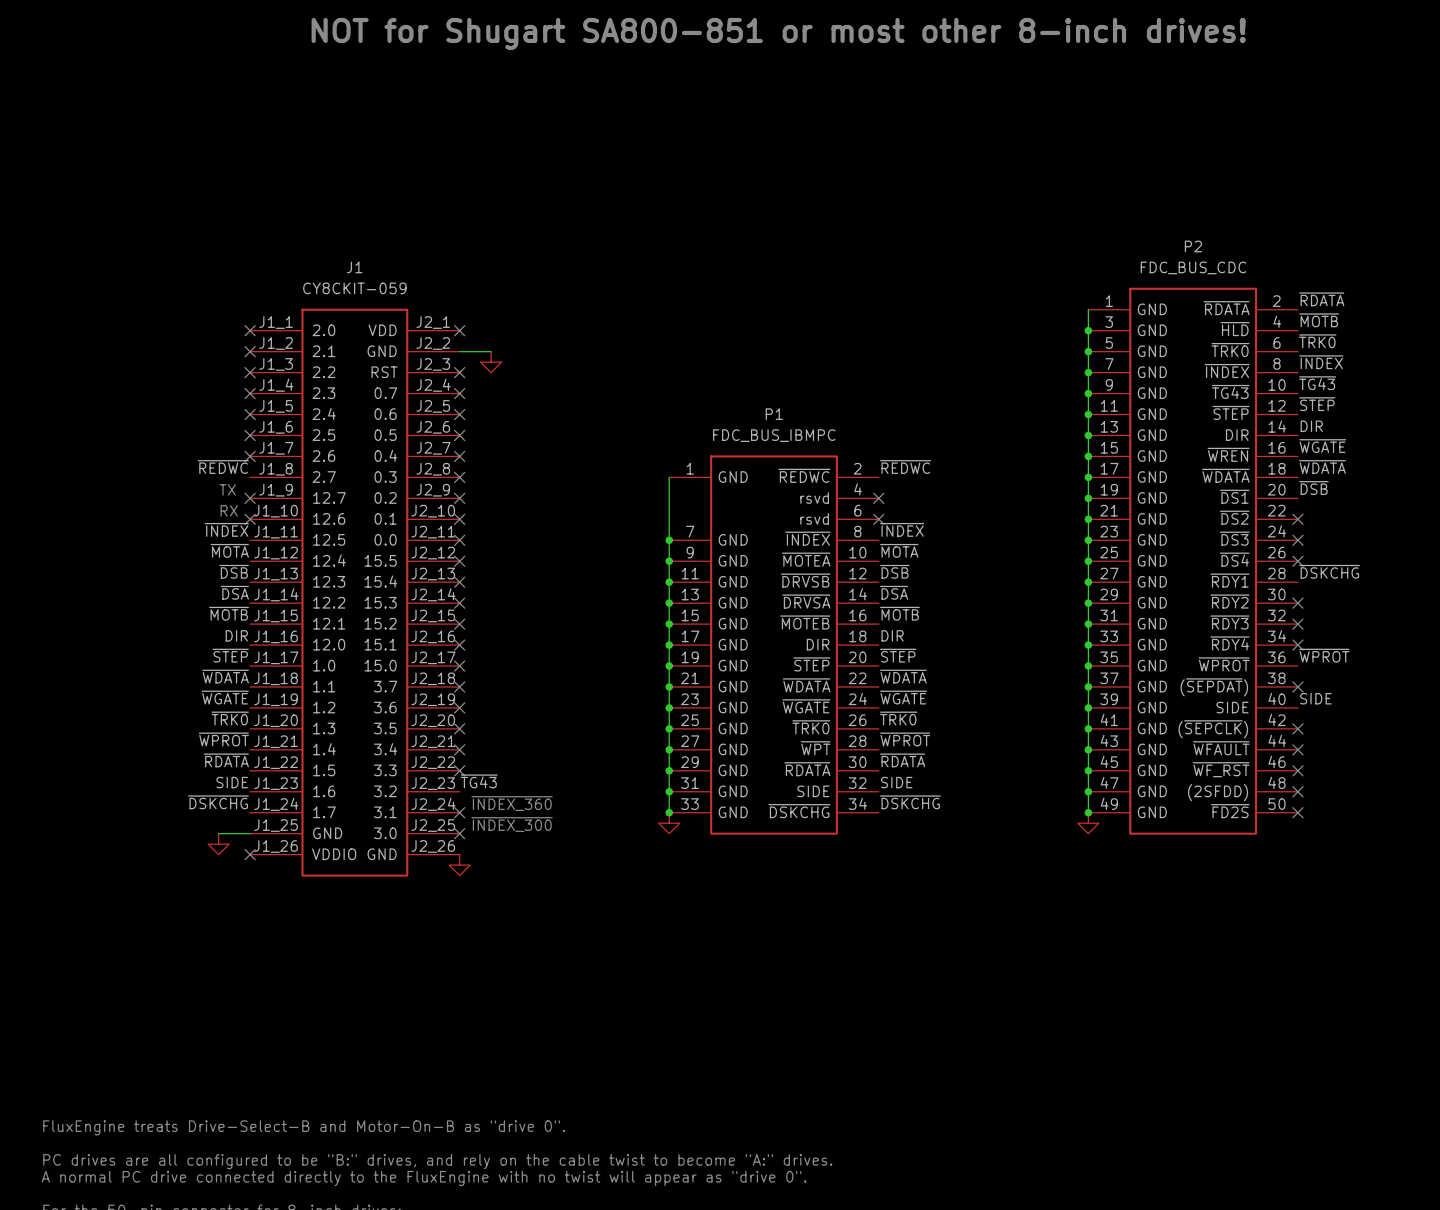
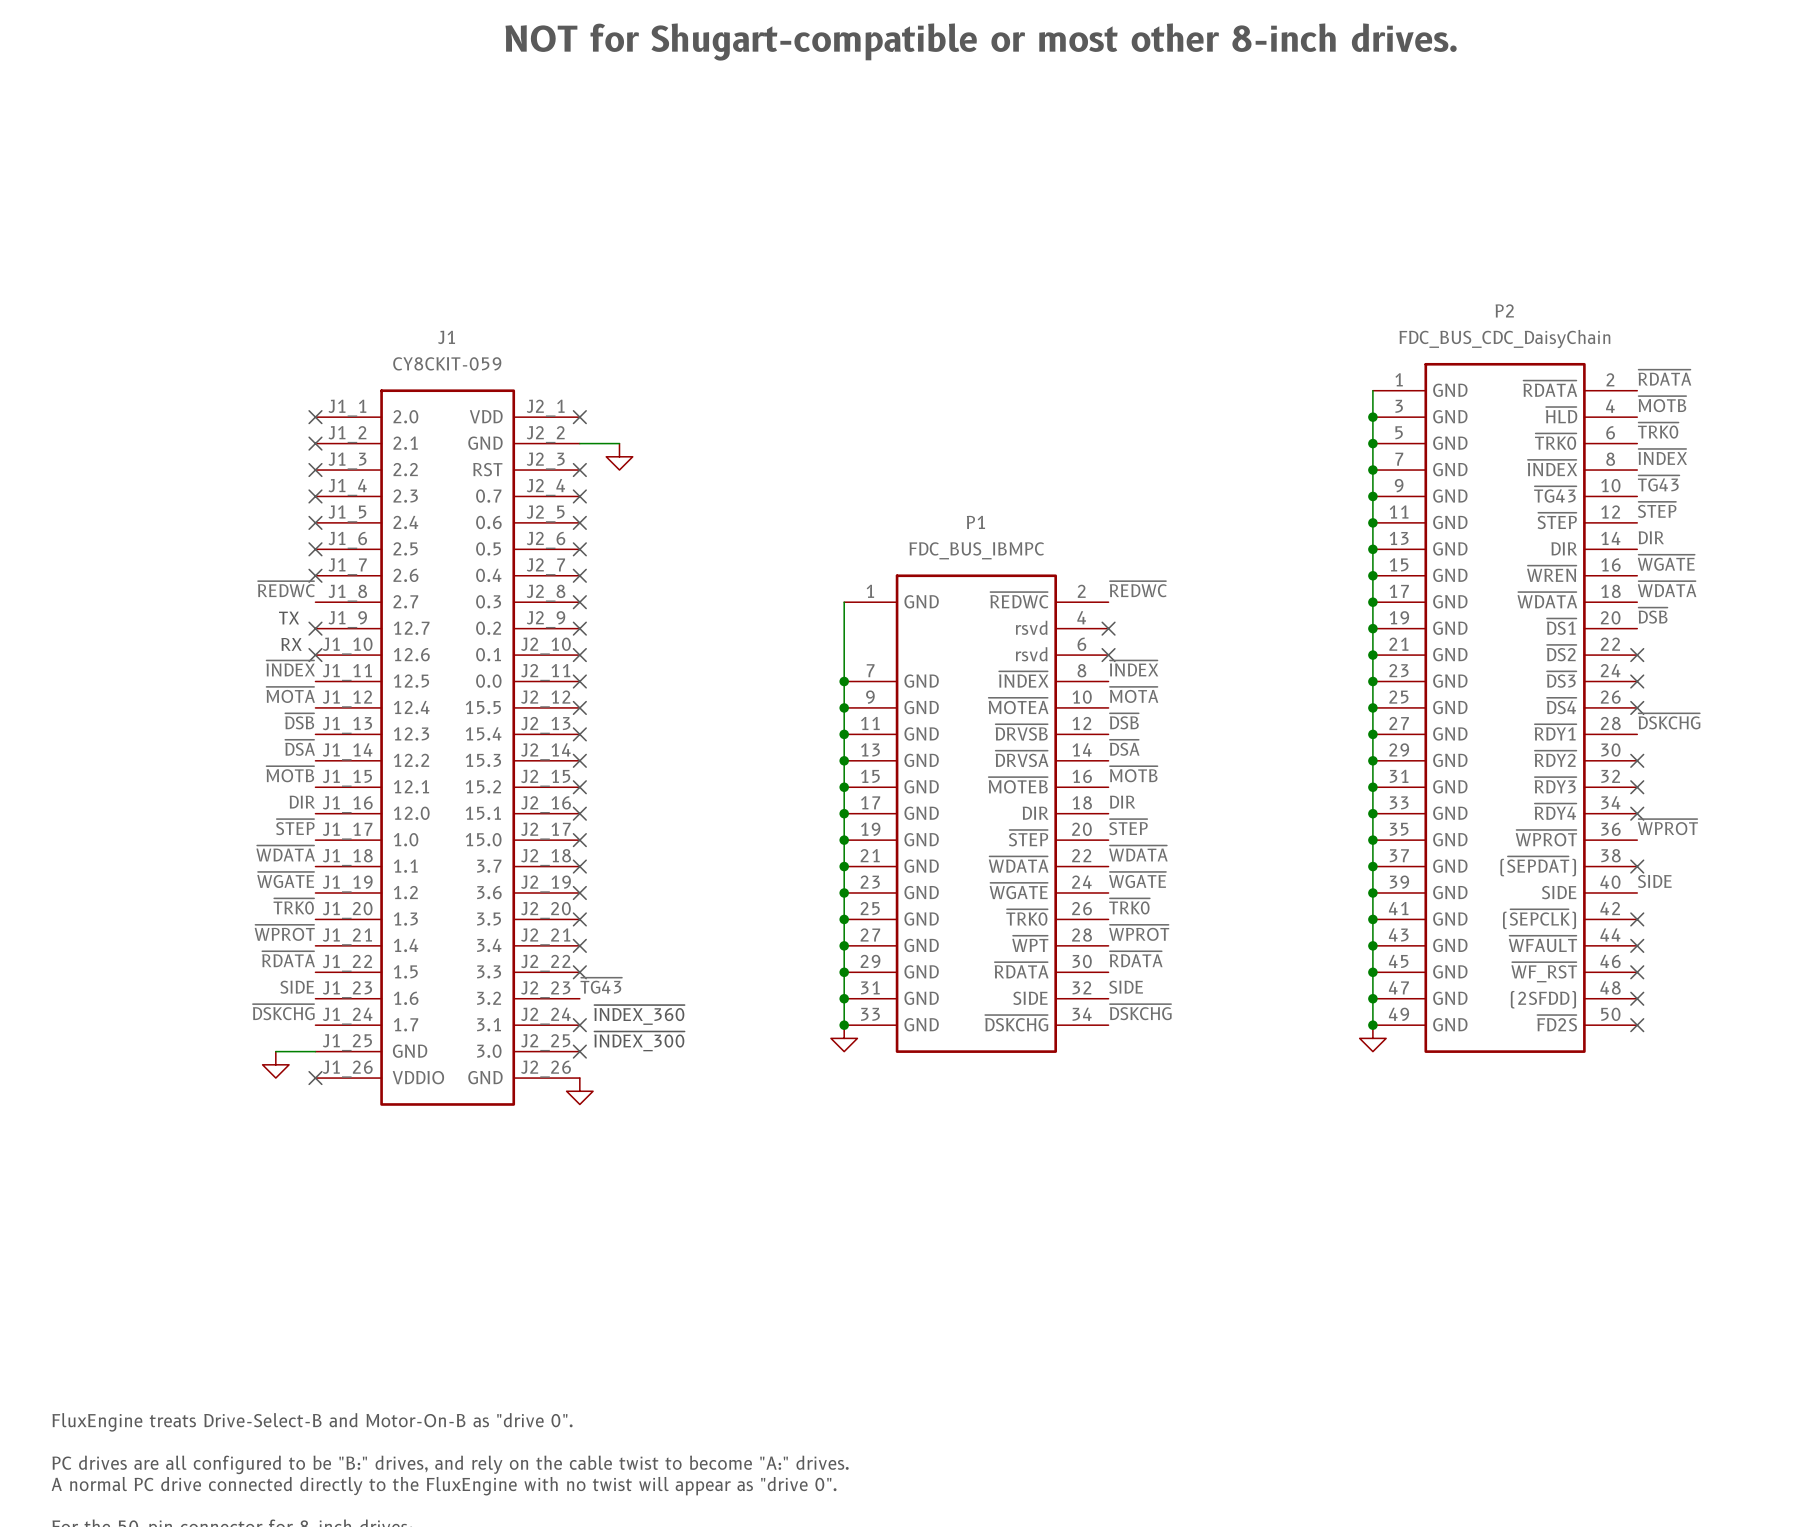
text: NOT for Shugart SA800-851 or most other 8-inch drives! (778, 33) -> NOT for Shugart-compatible or most other 8-inch drives. (981, 42)
P2 value: FDC_BUS_CDC (1193, 267) -> FDC_BUS_CDC_DaisyChain (1504, 339)

